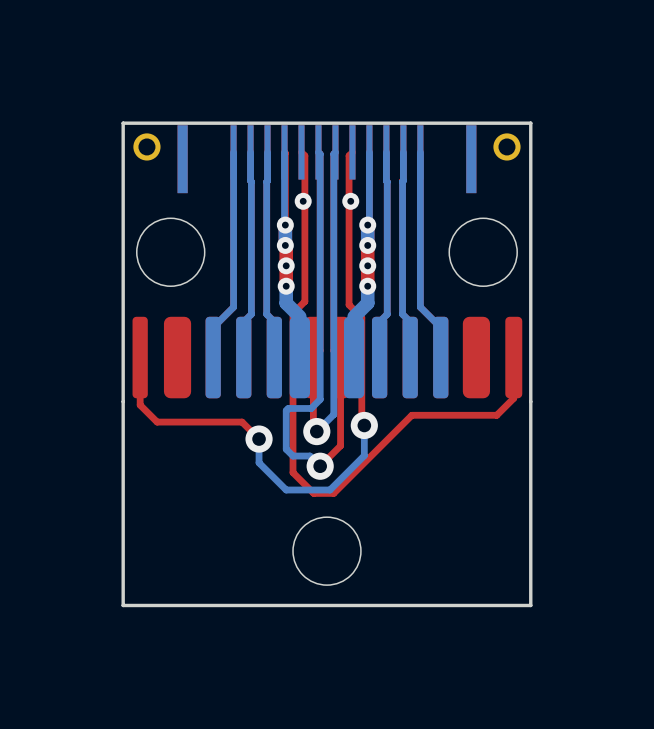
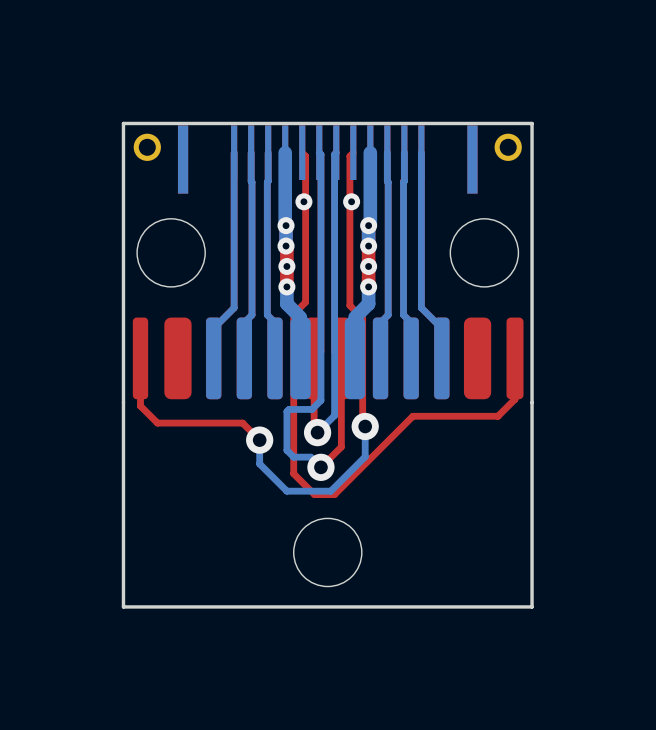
bottom track width: thin (284, 152) (284, 224) -> thick (285, 152) (285, 224)
bottom track width: thin (369, 152) (369, 223) (367, 225) -> thick (370, 152) (370, 223) (368, 225)

